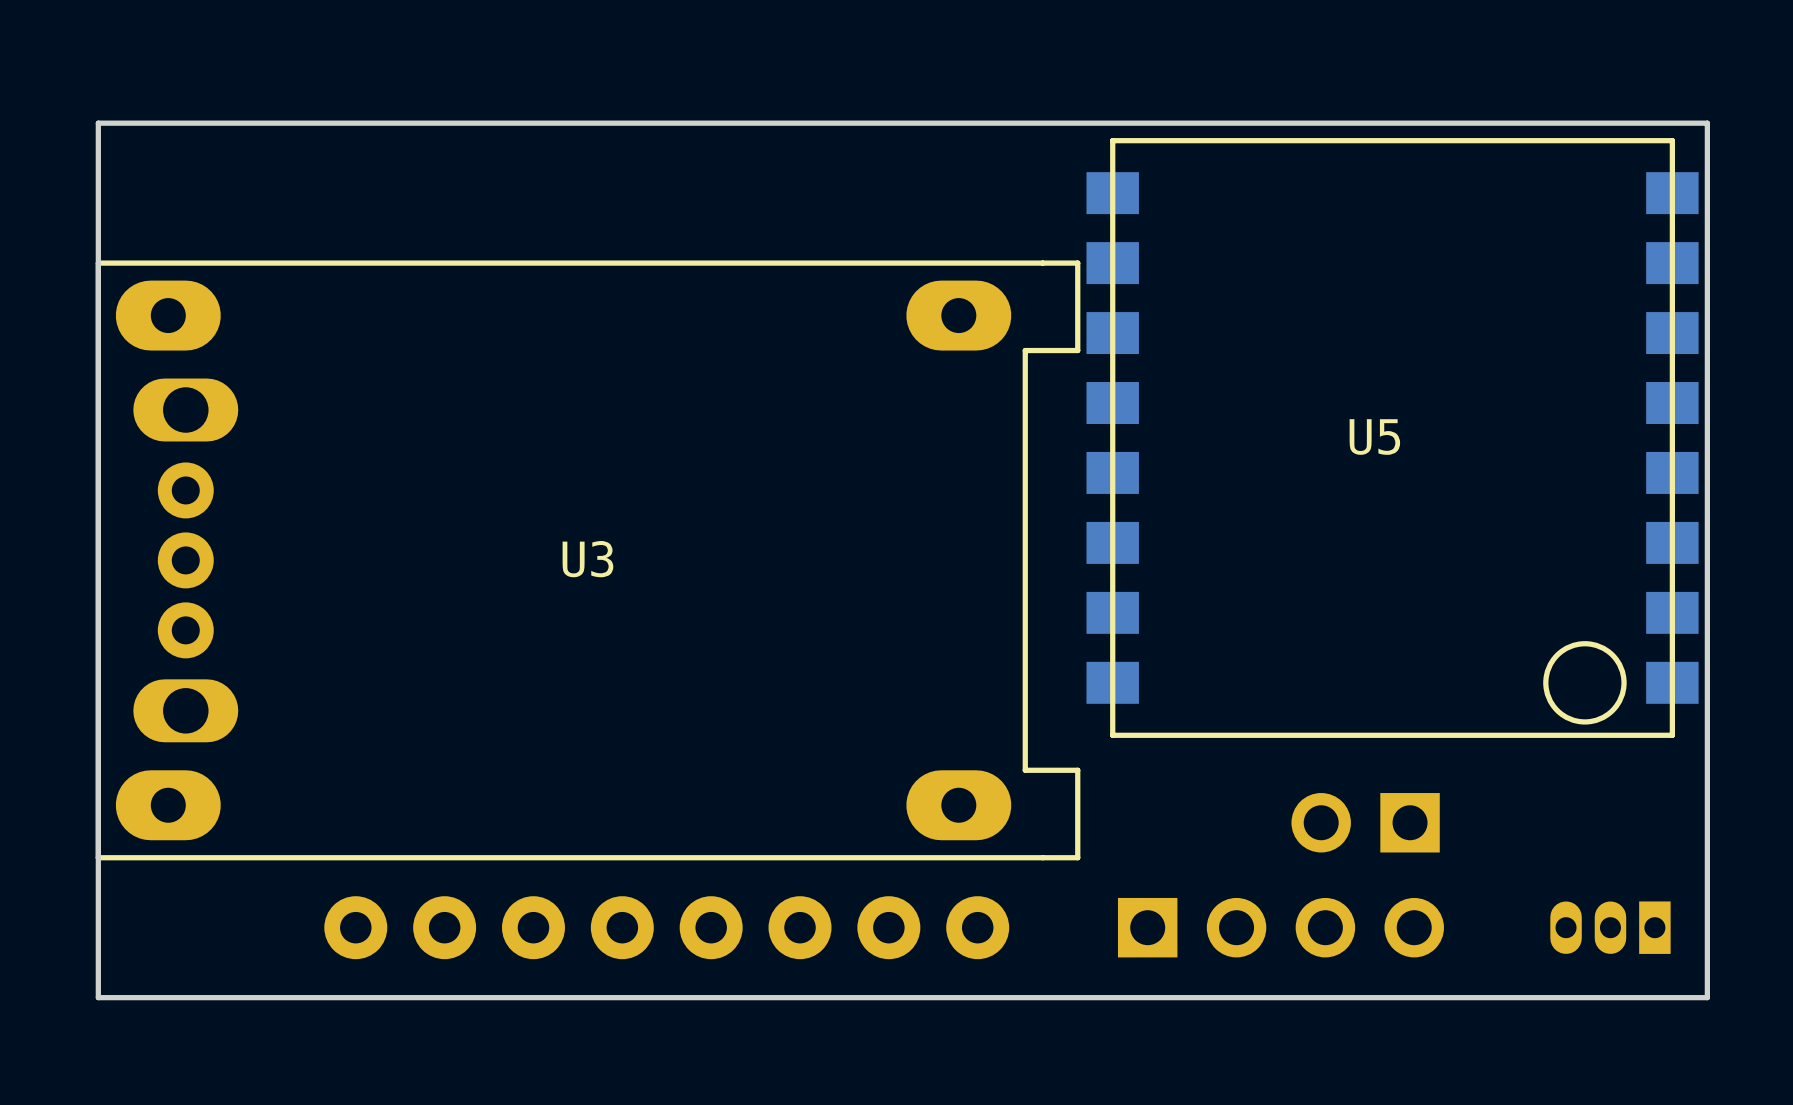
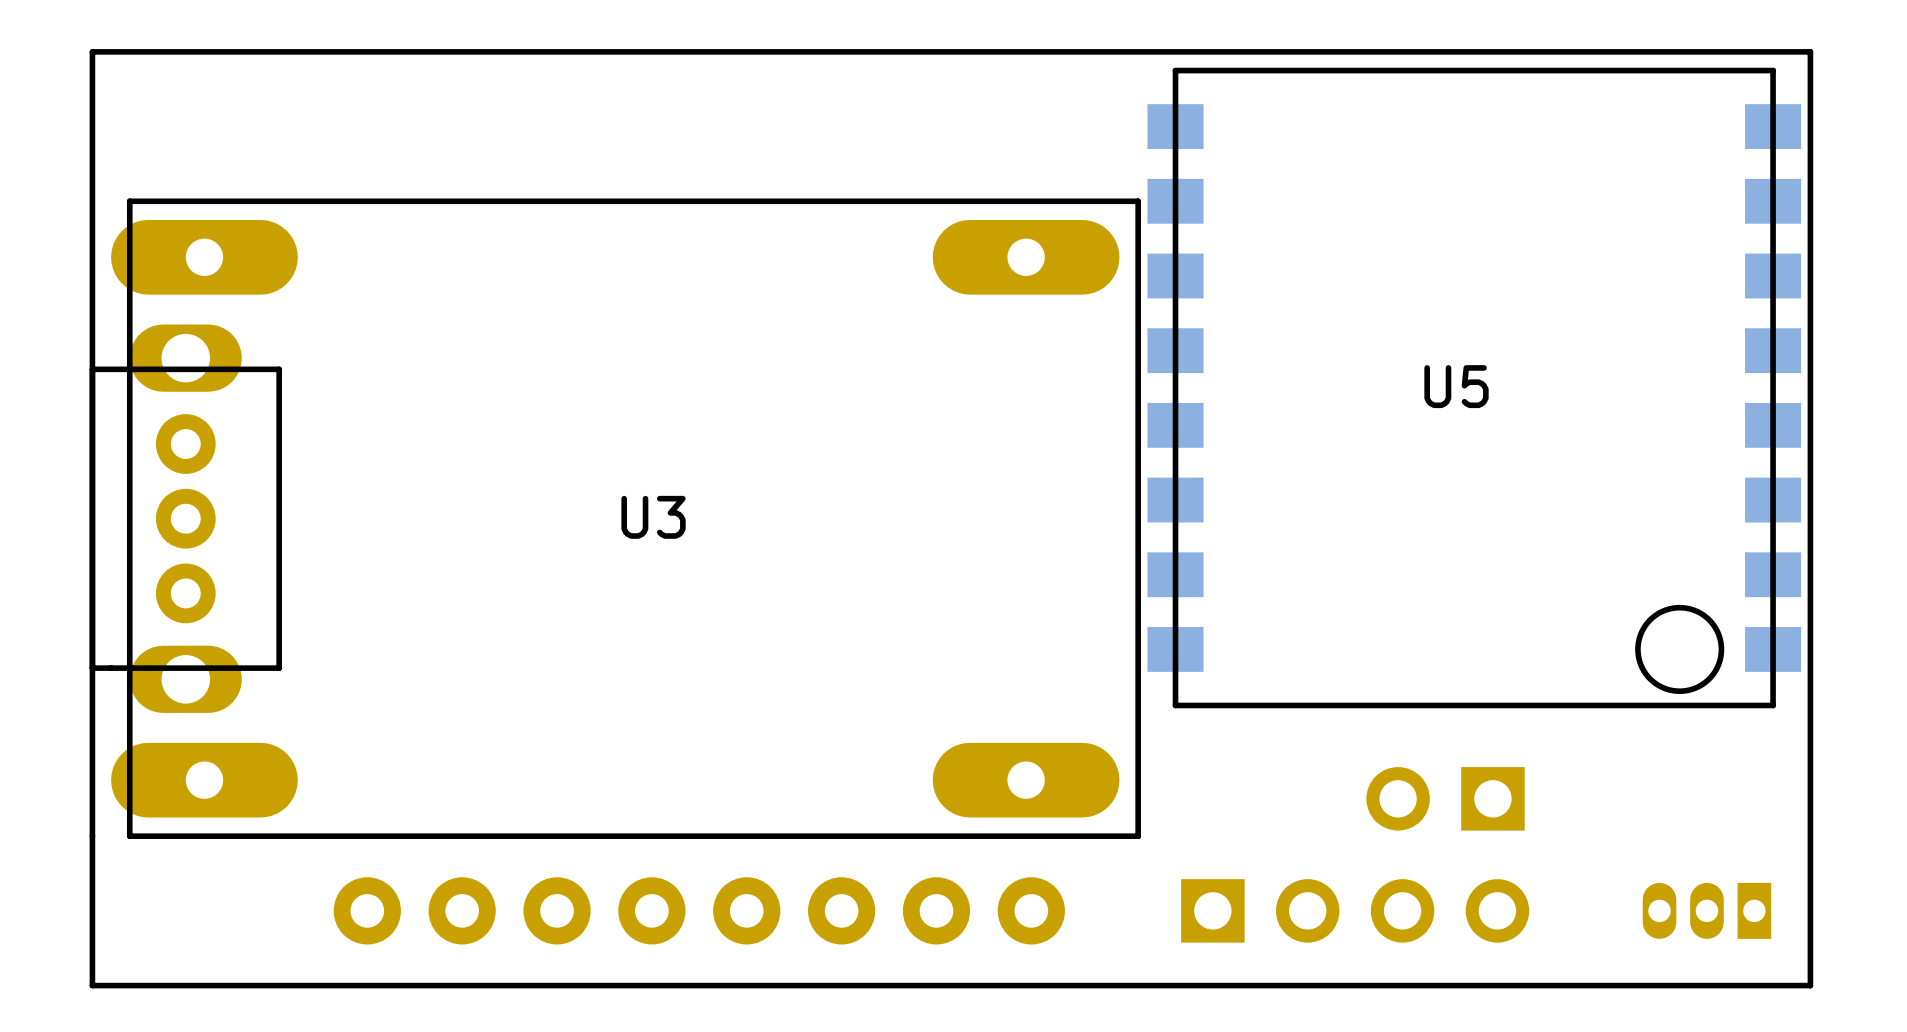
U3 footprint: [95, 260, 1081, 861] -> [89, 198, 1141, 839]

